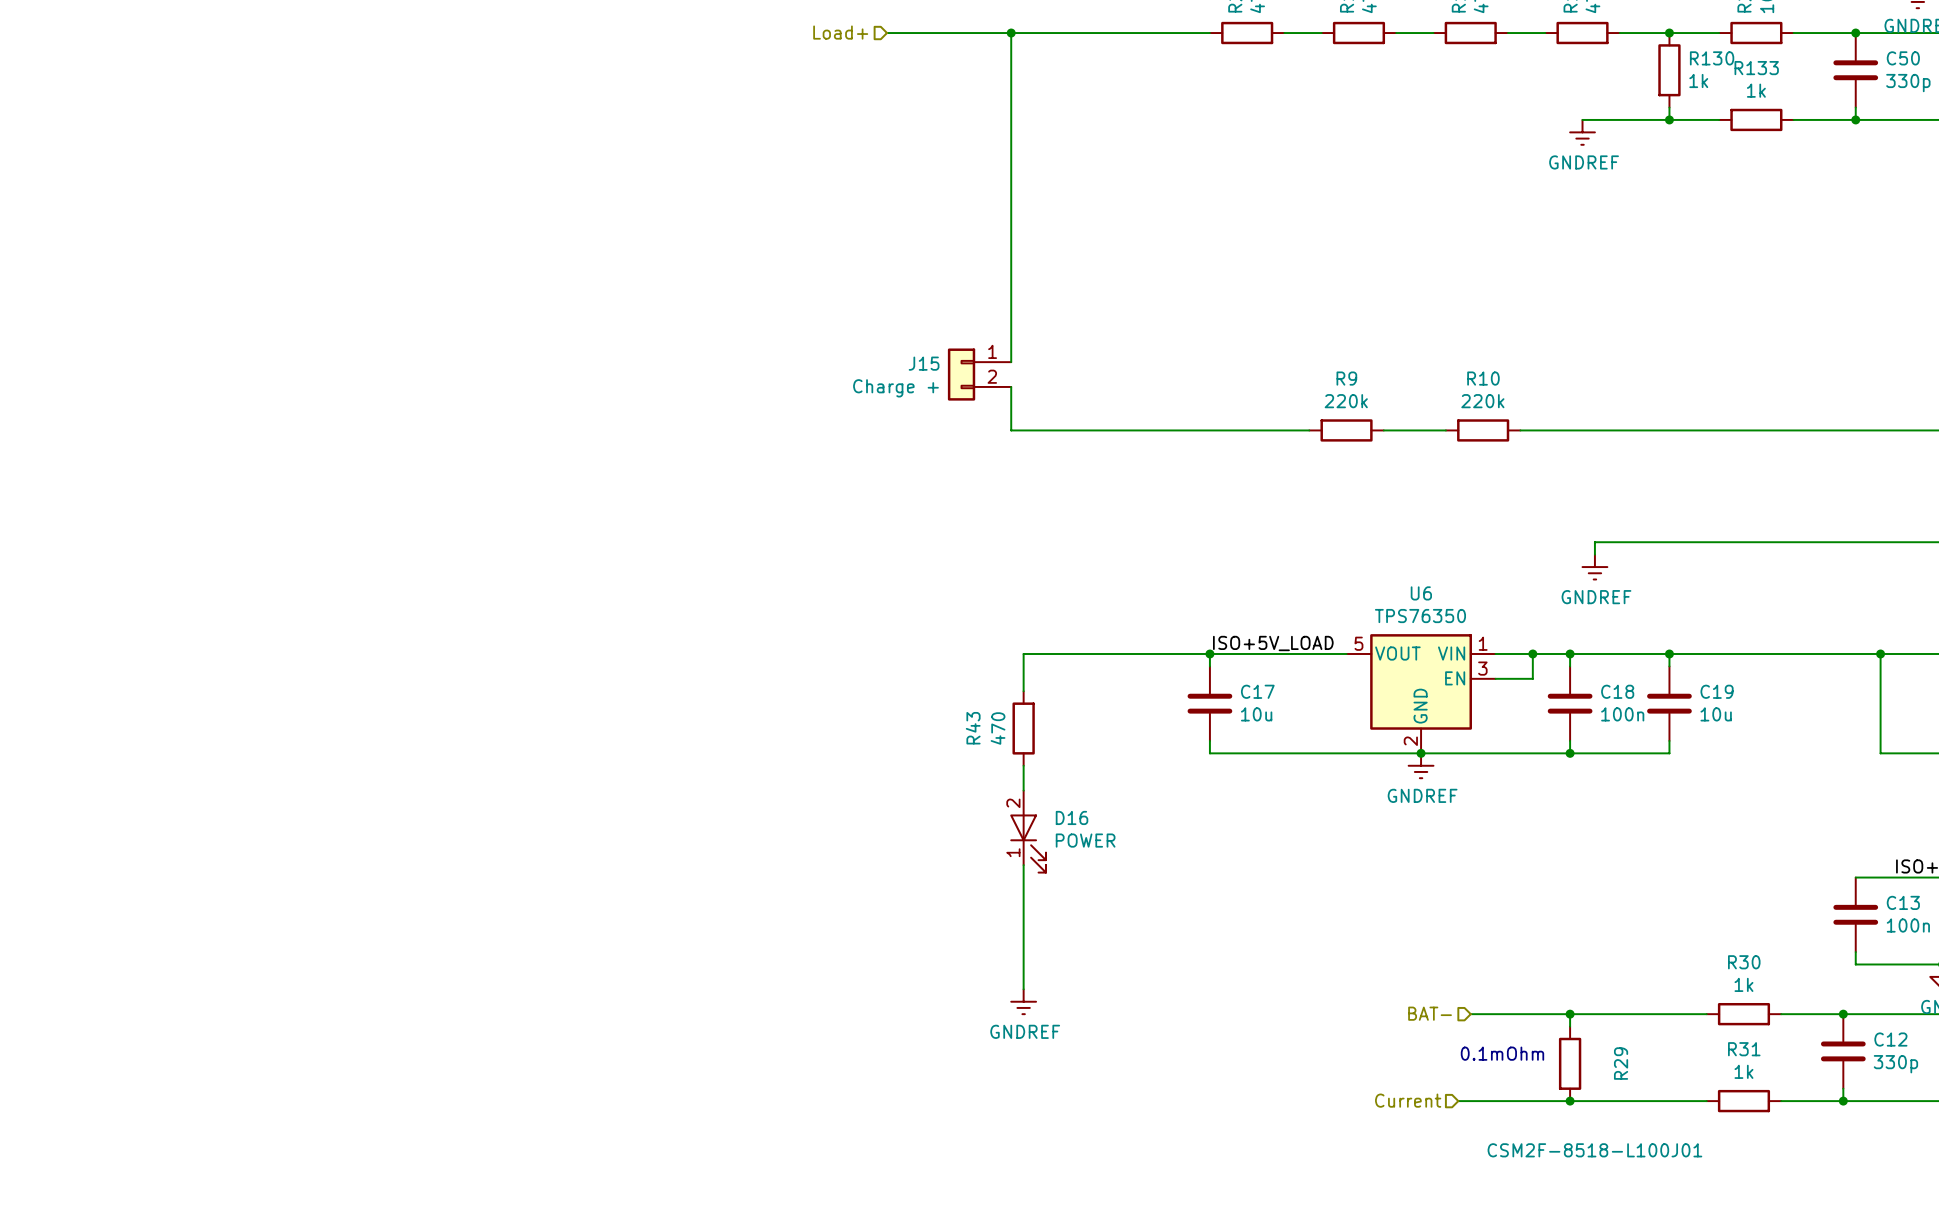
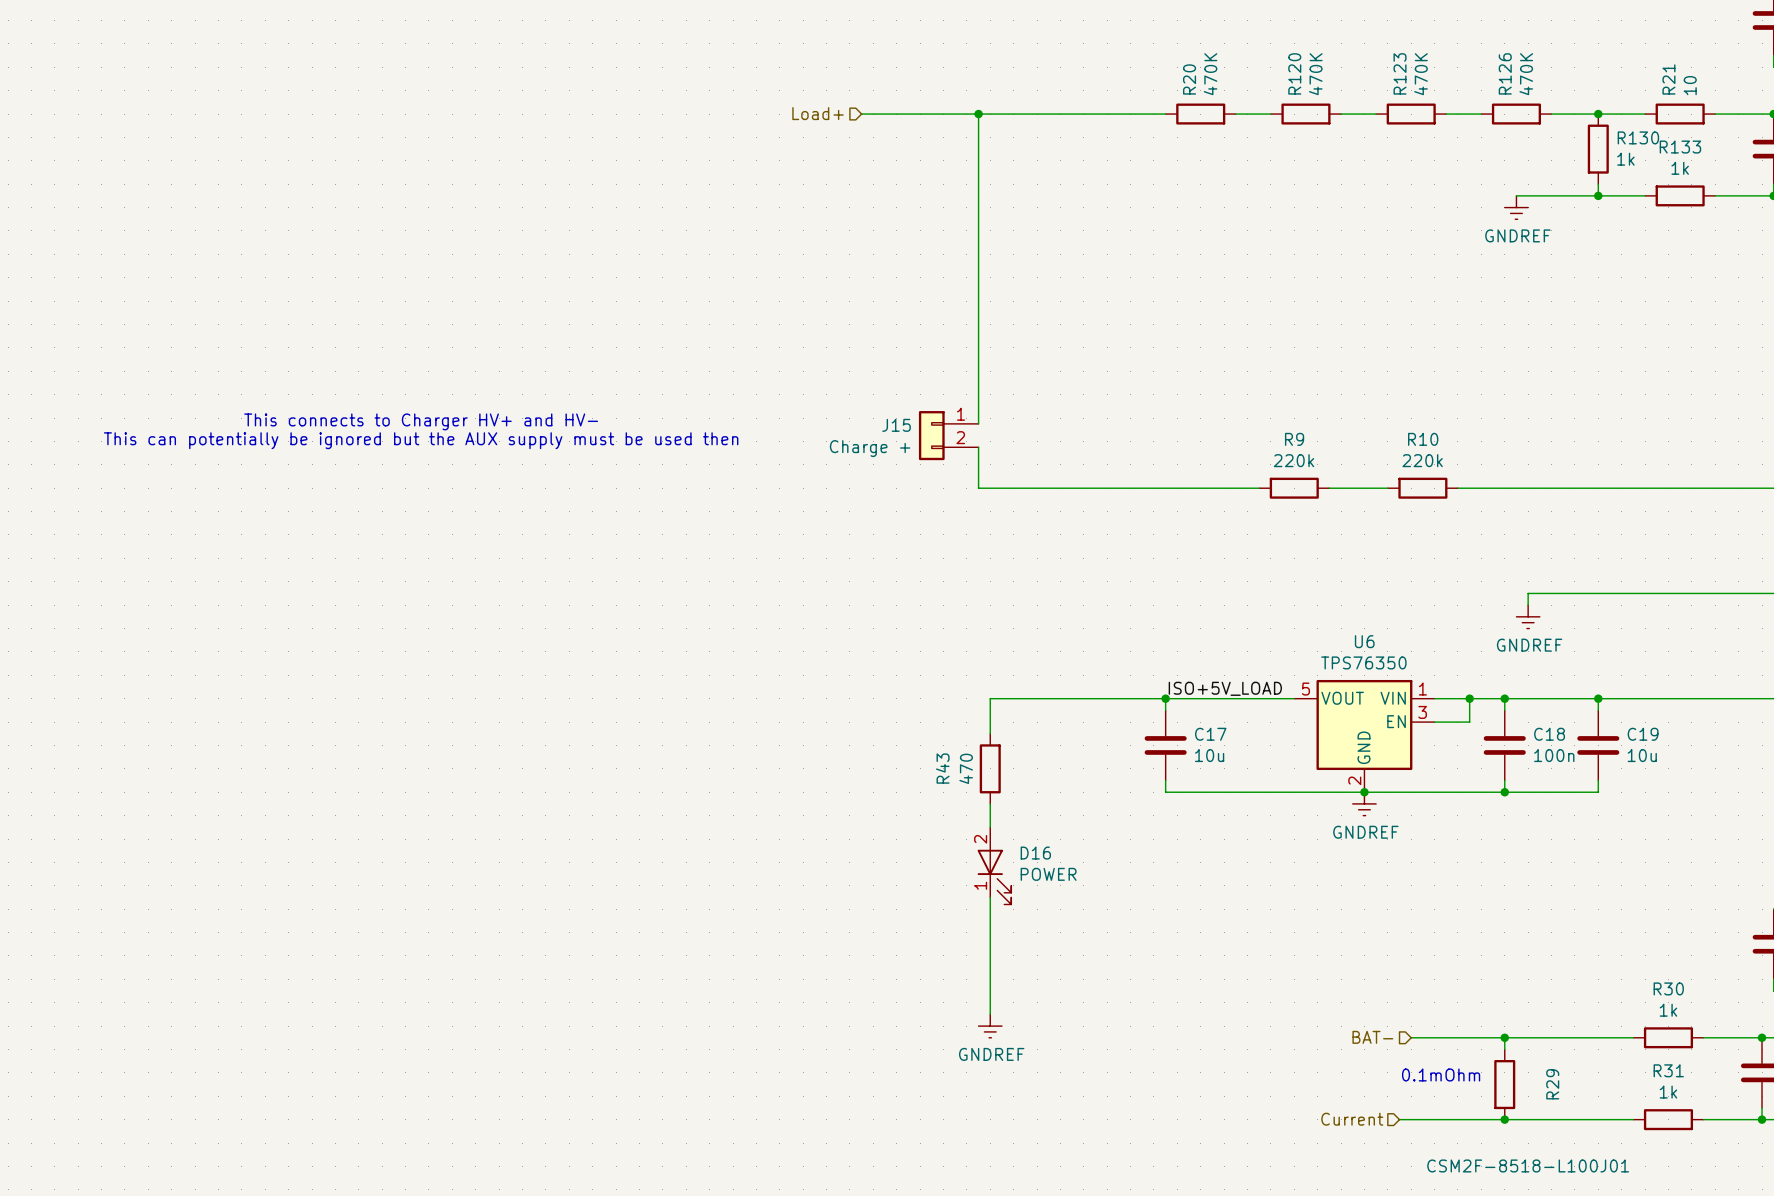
text: none -> This connects to Charger HV+ and HV- (421, 421)
text: none -> This can potentially be ignored but the AUX supply must be used then (421, 440)

